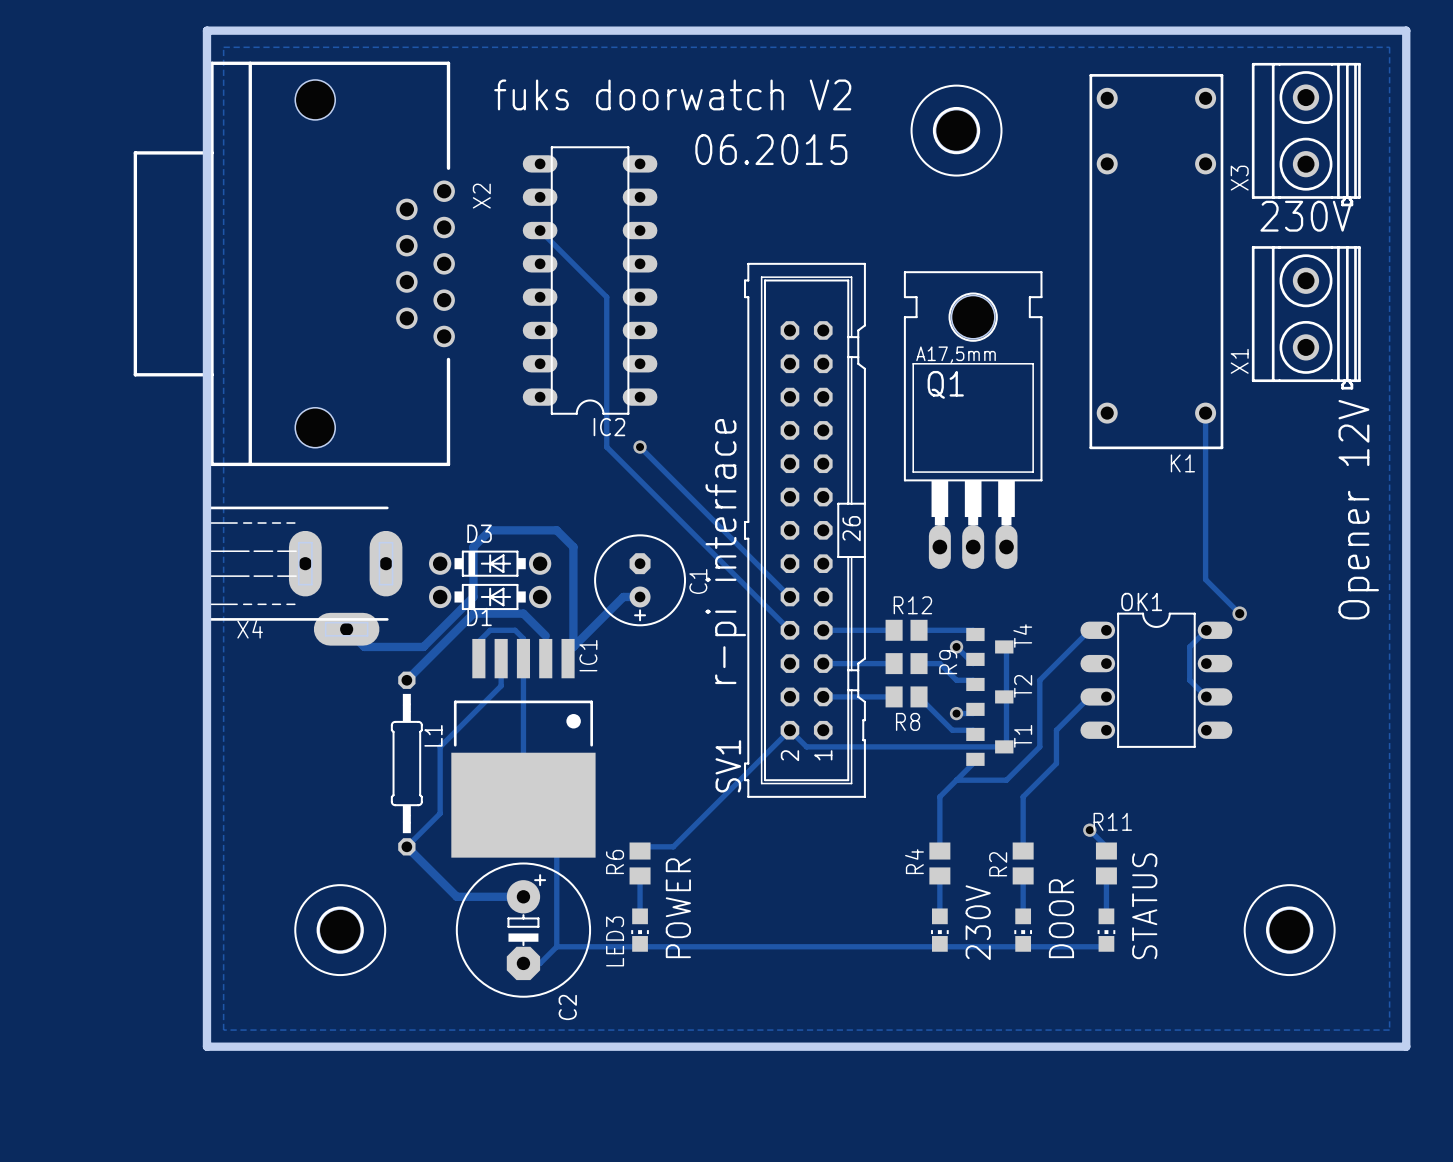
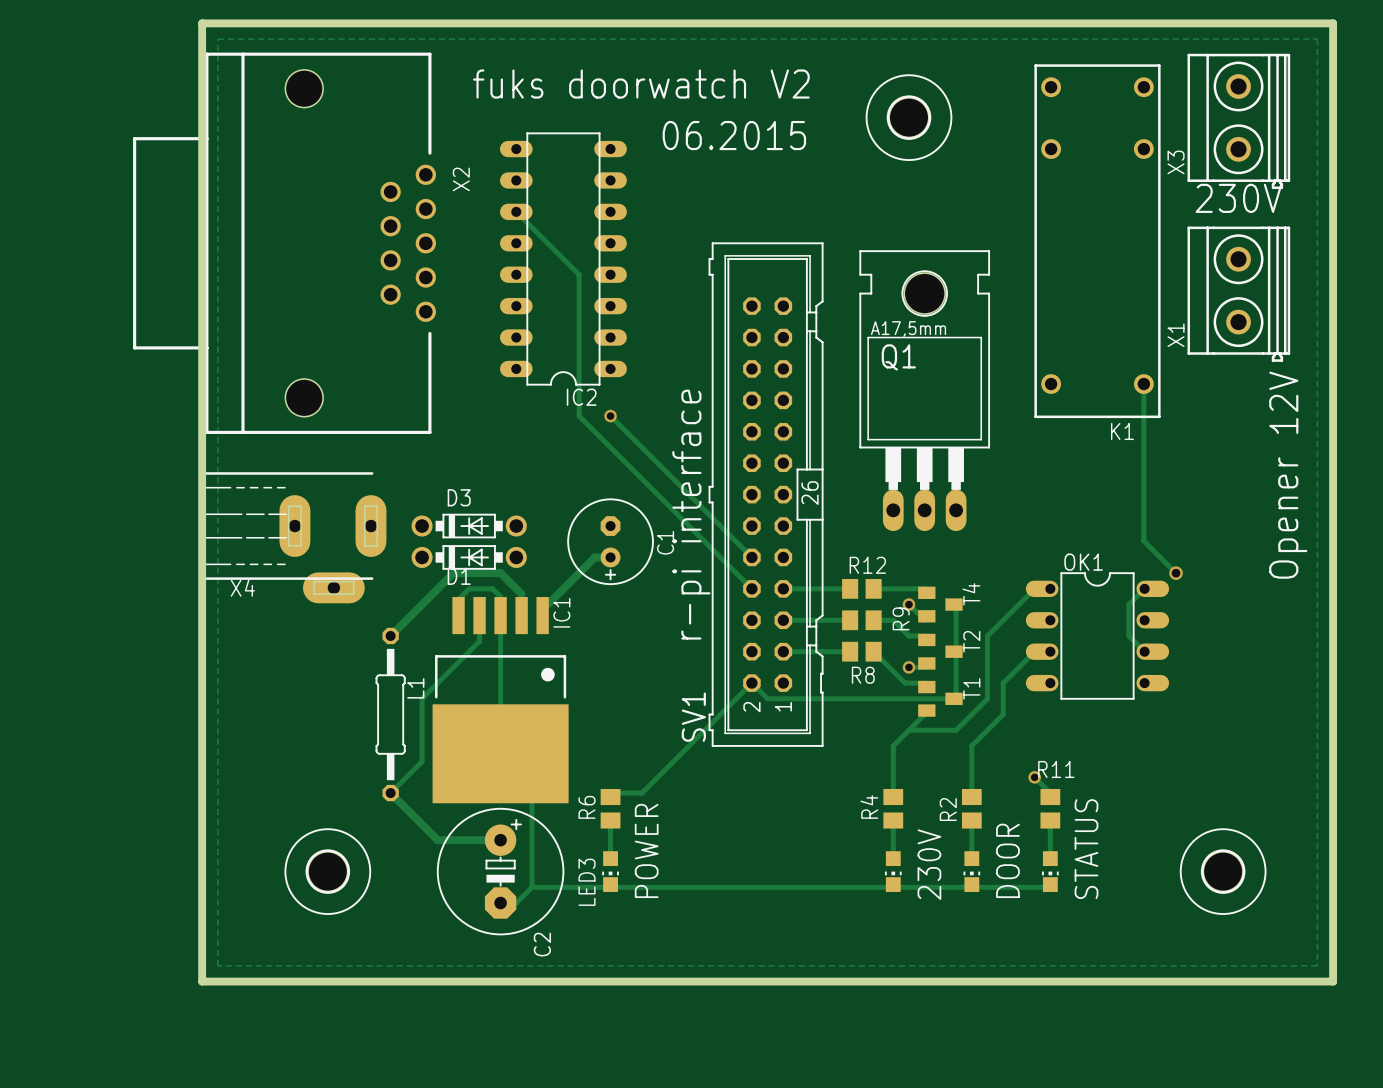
track: (346, 629) (364, 646) (423, 646) (473, 596) (473, 547) (490, 530) (556, 530) (573, 547) (573, 646) -> none

